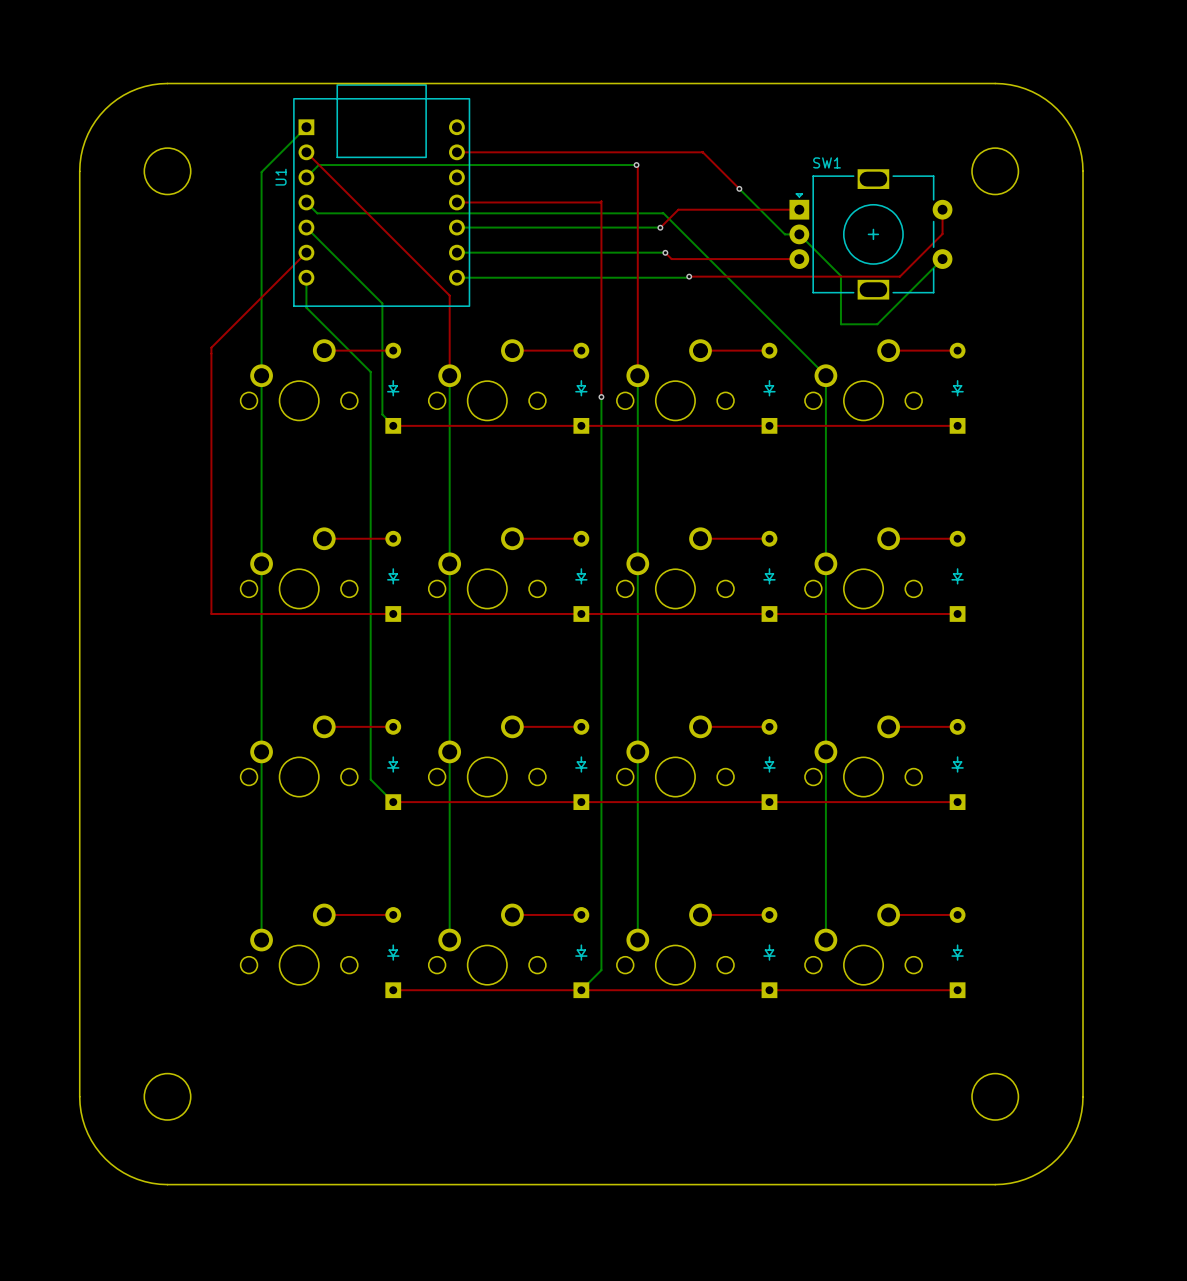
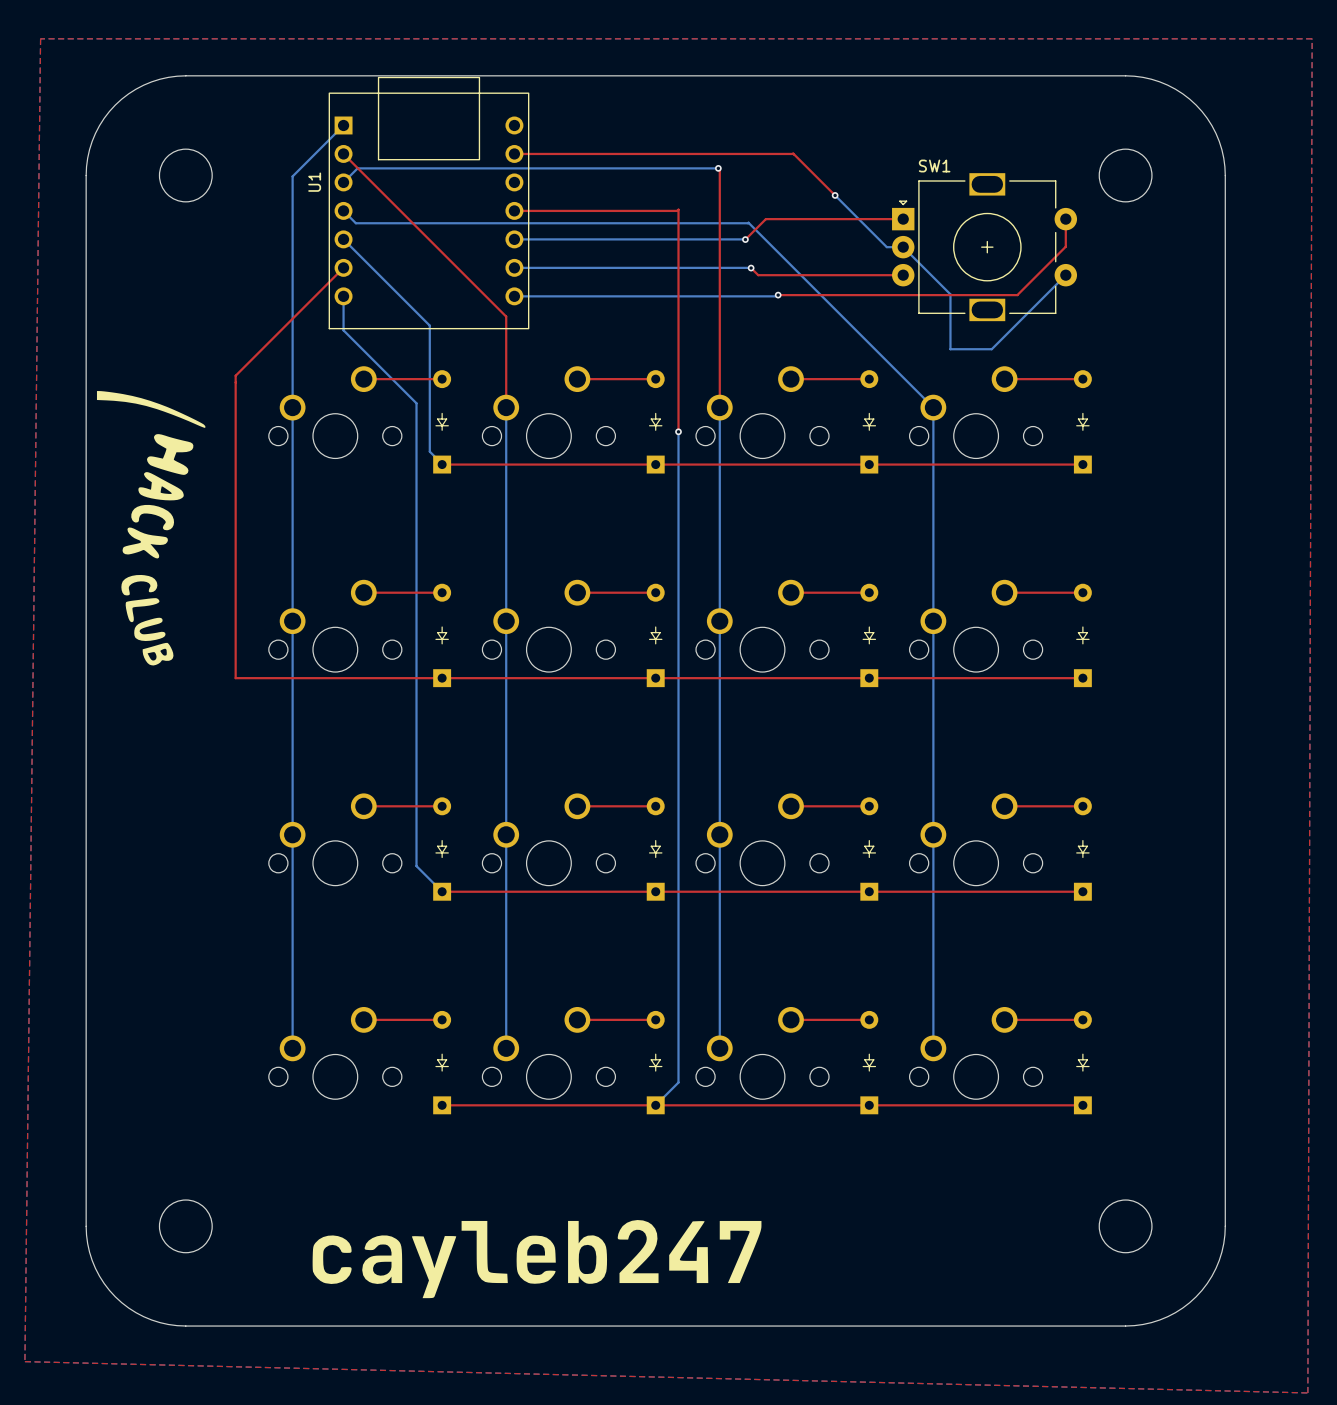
top zone outline: none -> (40, 38) (24, 1361) (1307, 1392) (1312, 38) (40, 38)
drawing: none -> [96, 391, 206, 666]
drawing: none -> [312, 1220, 762, 1299]

